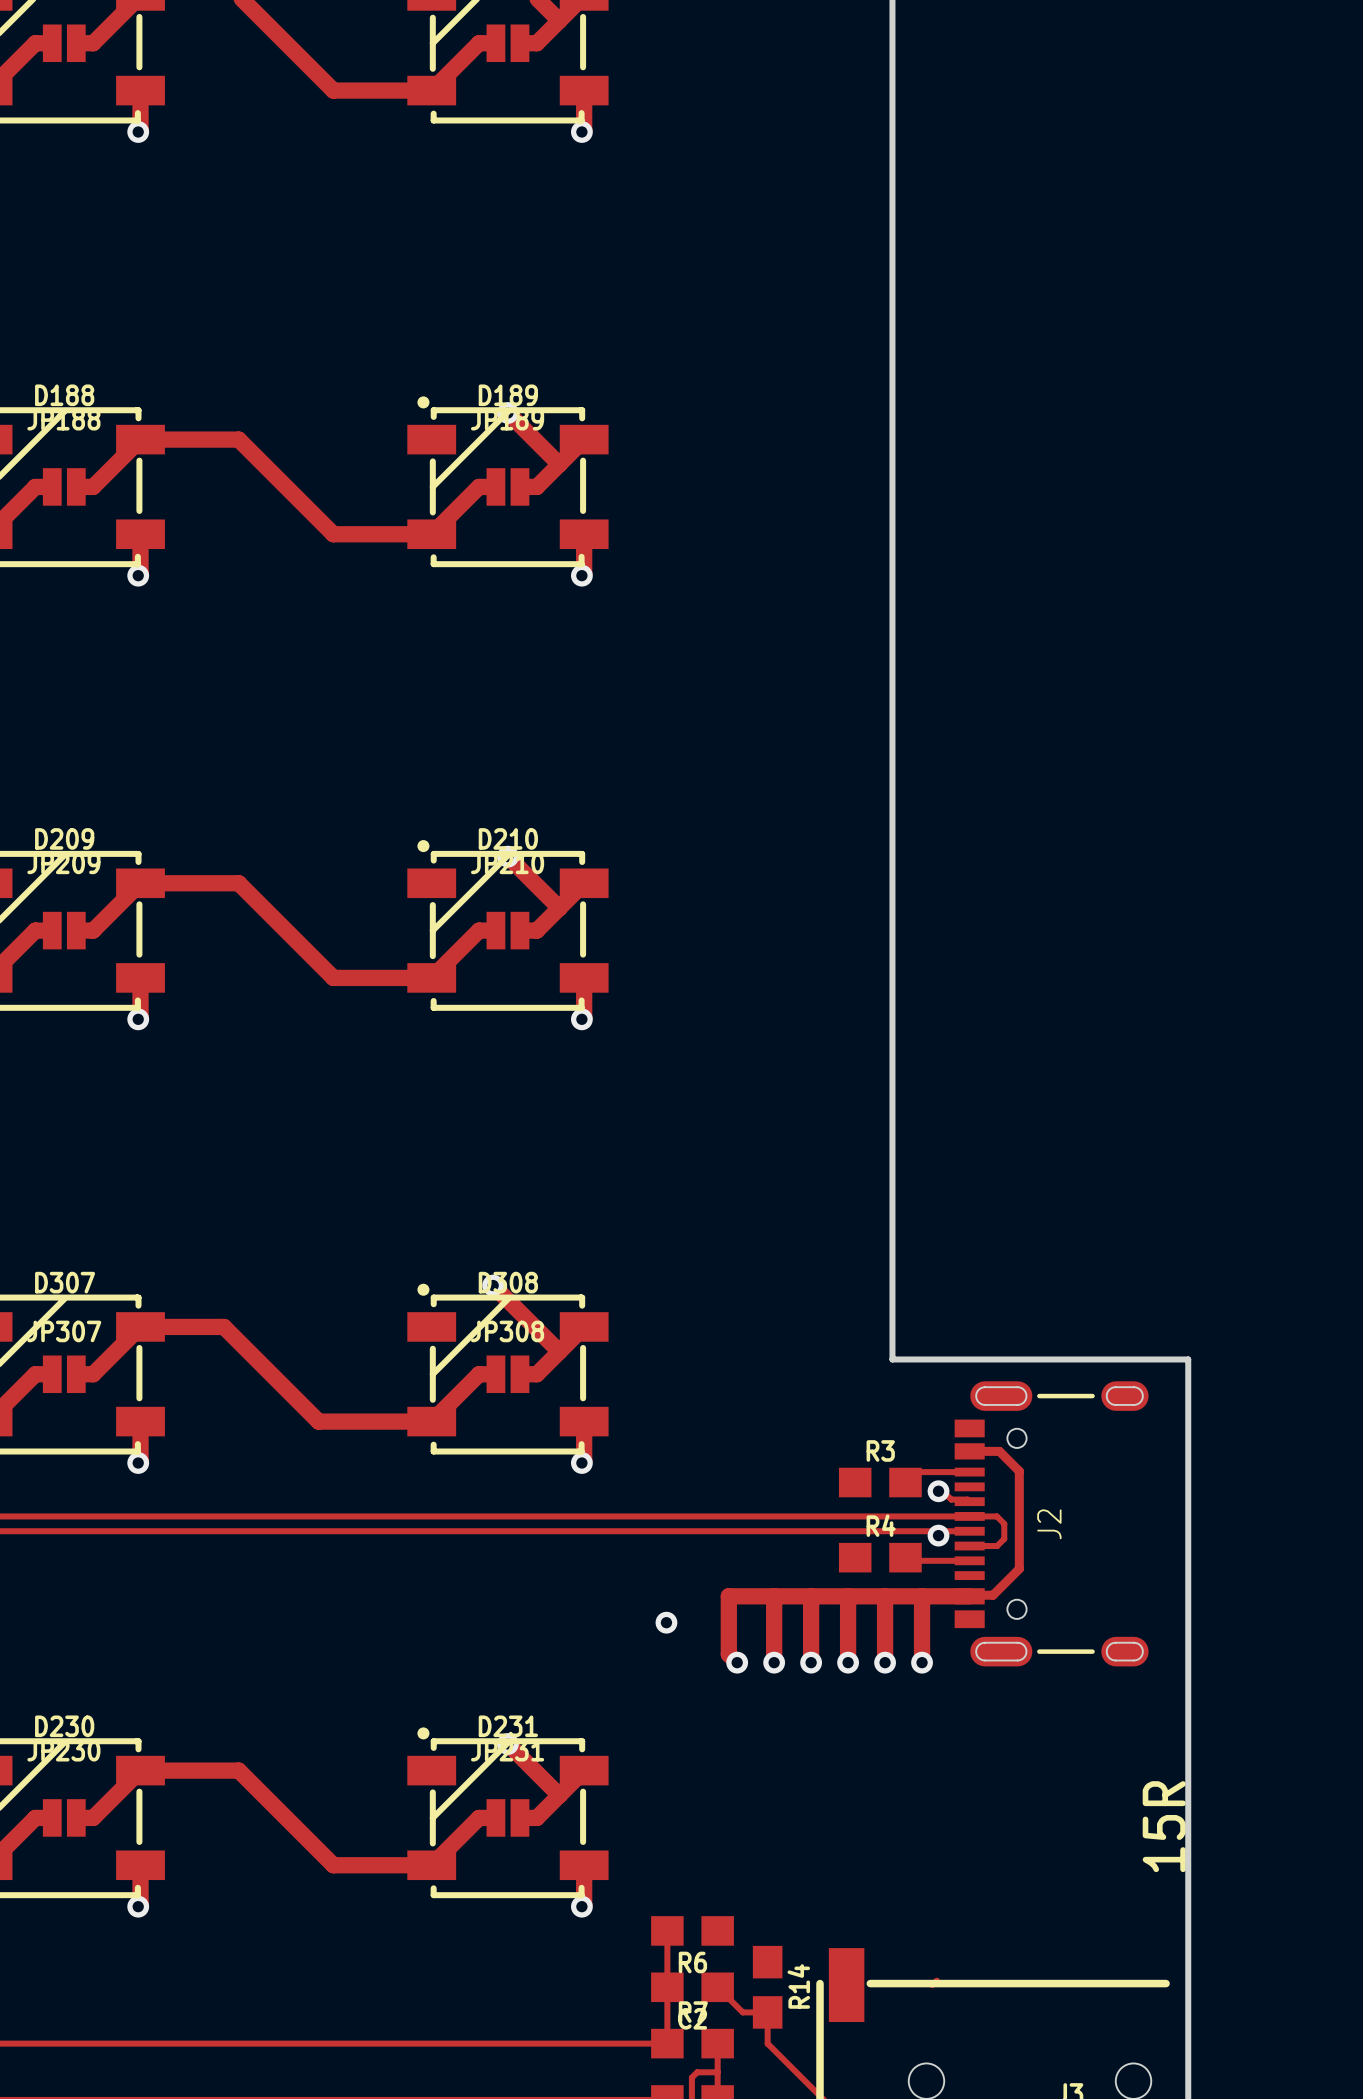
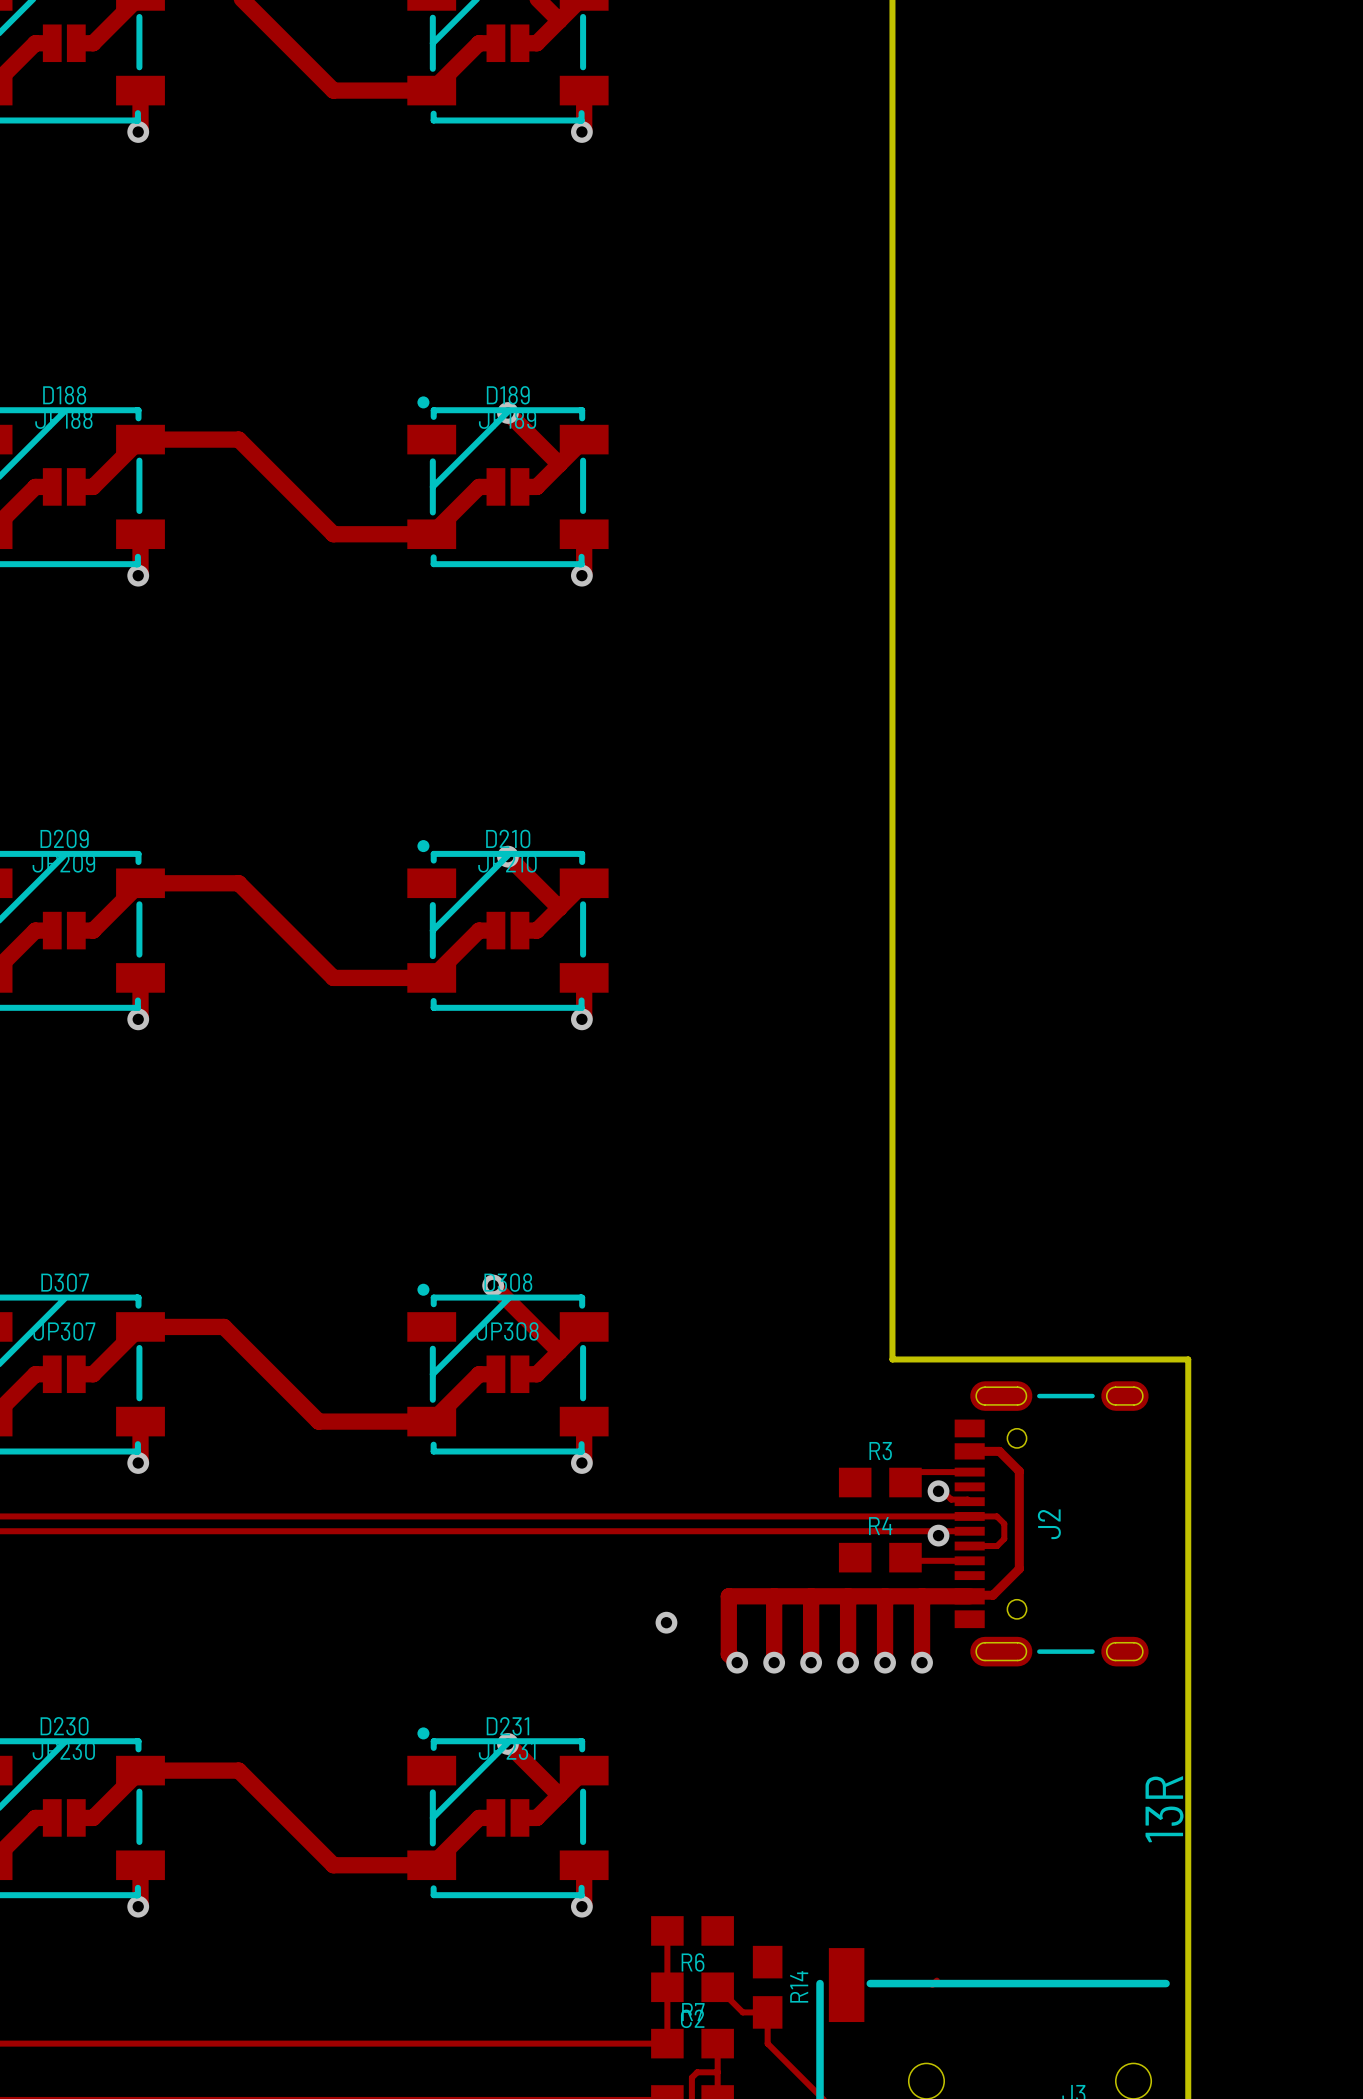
text: 15R (1164, 1826) -> 13R (1164, 1809)

